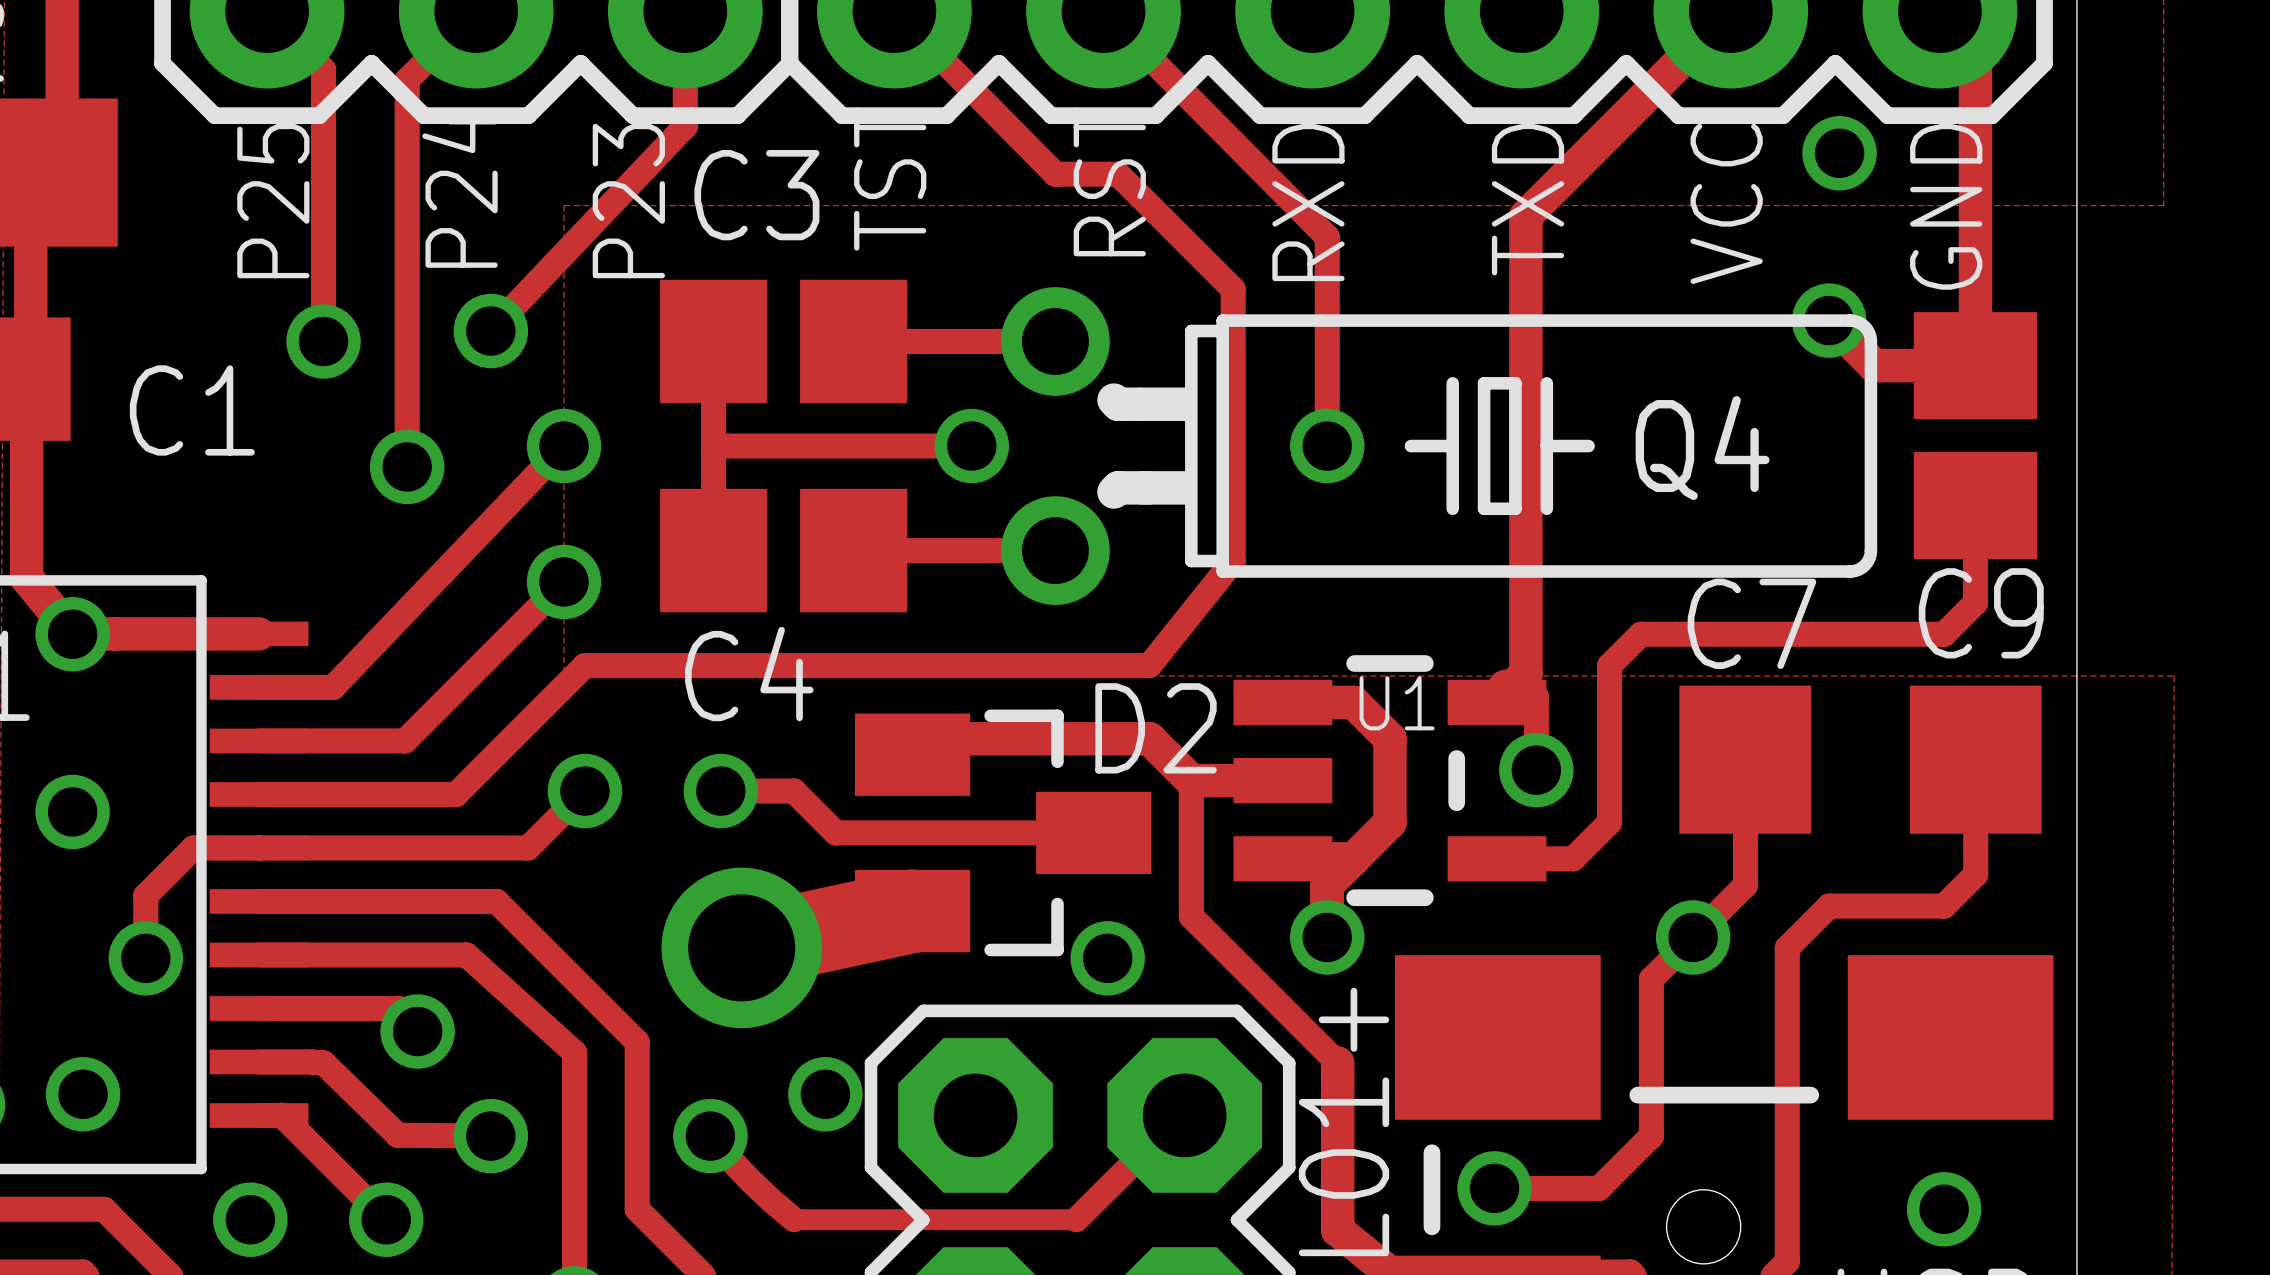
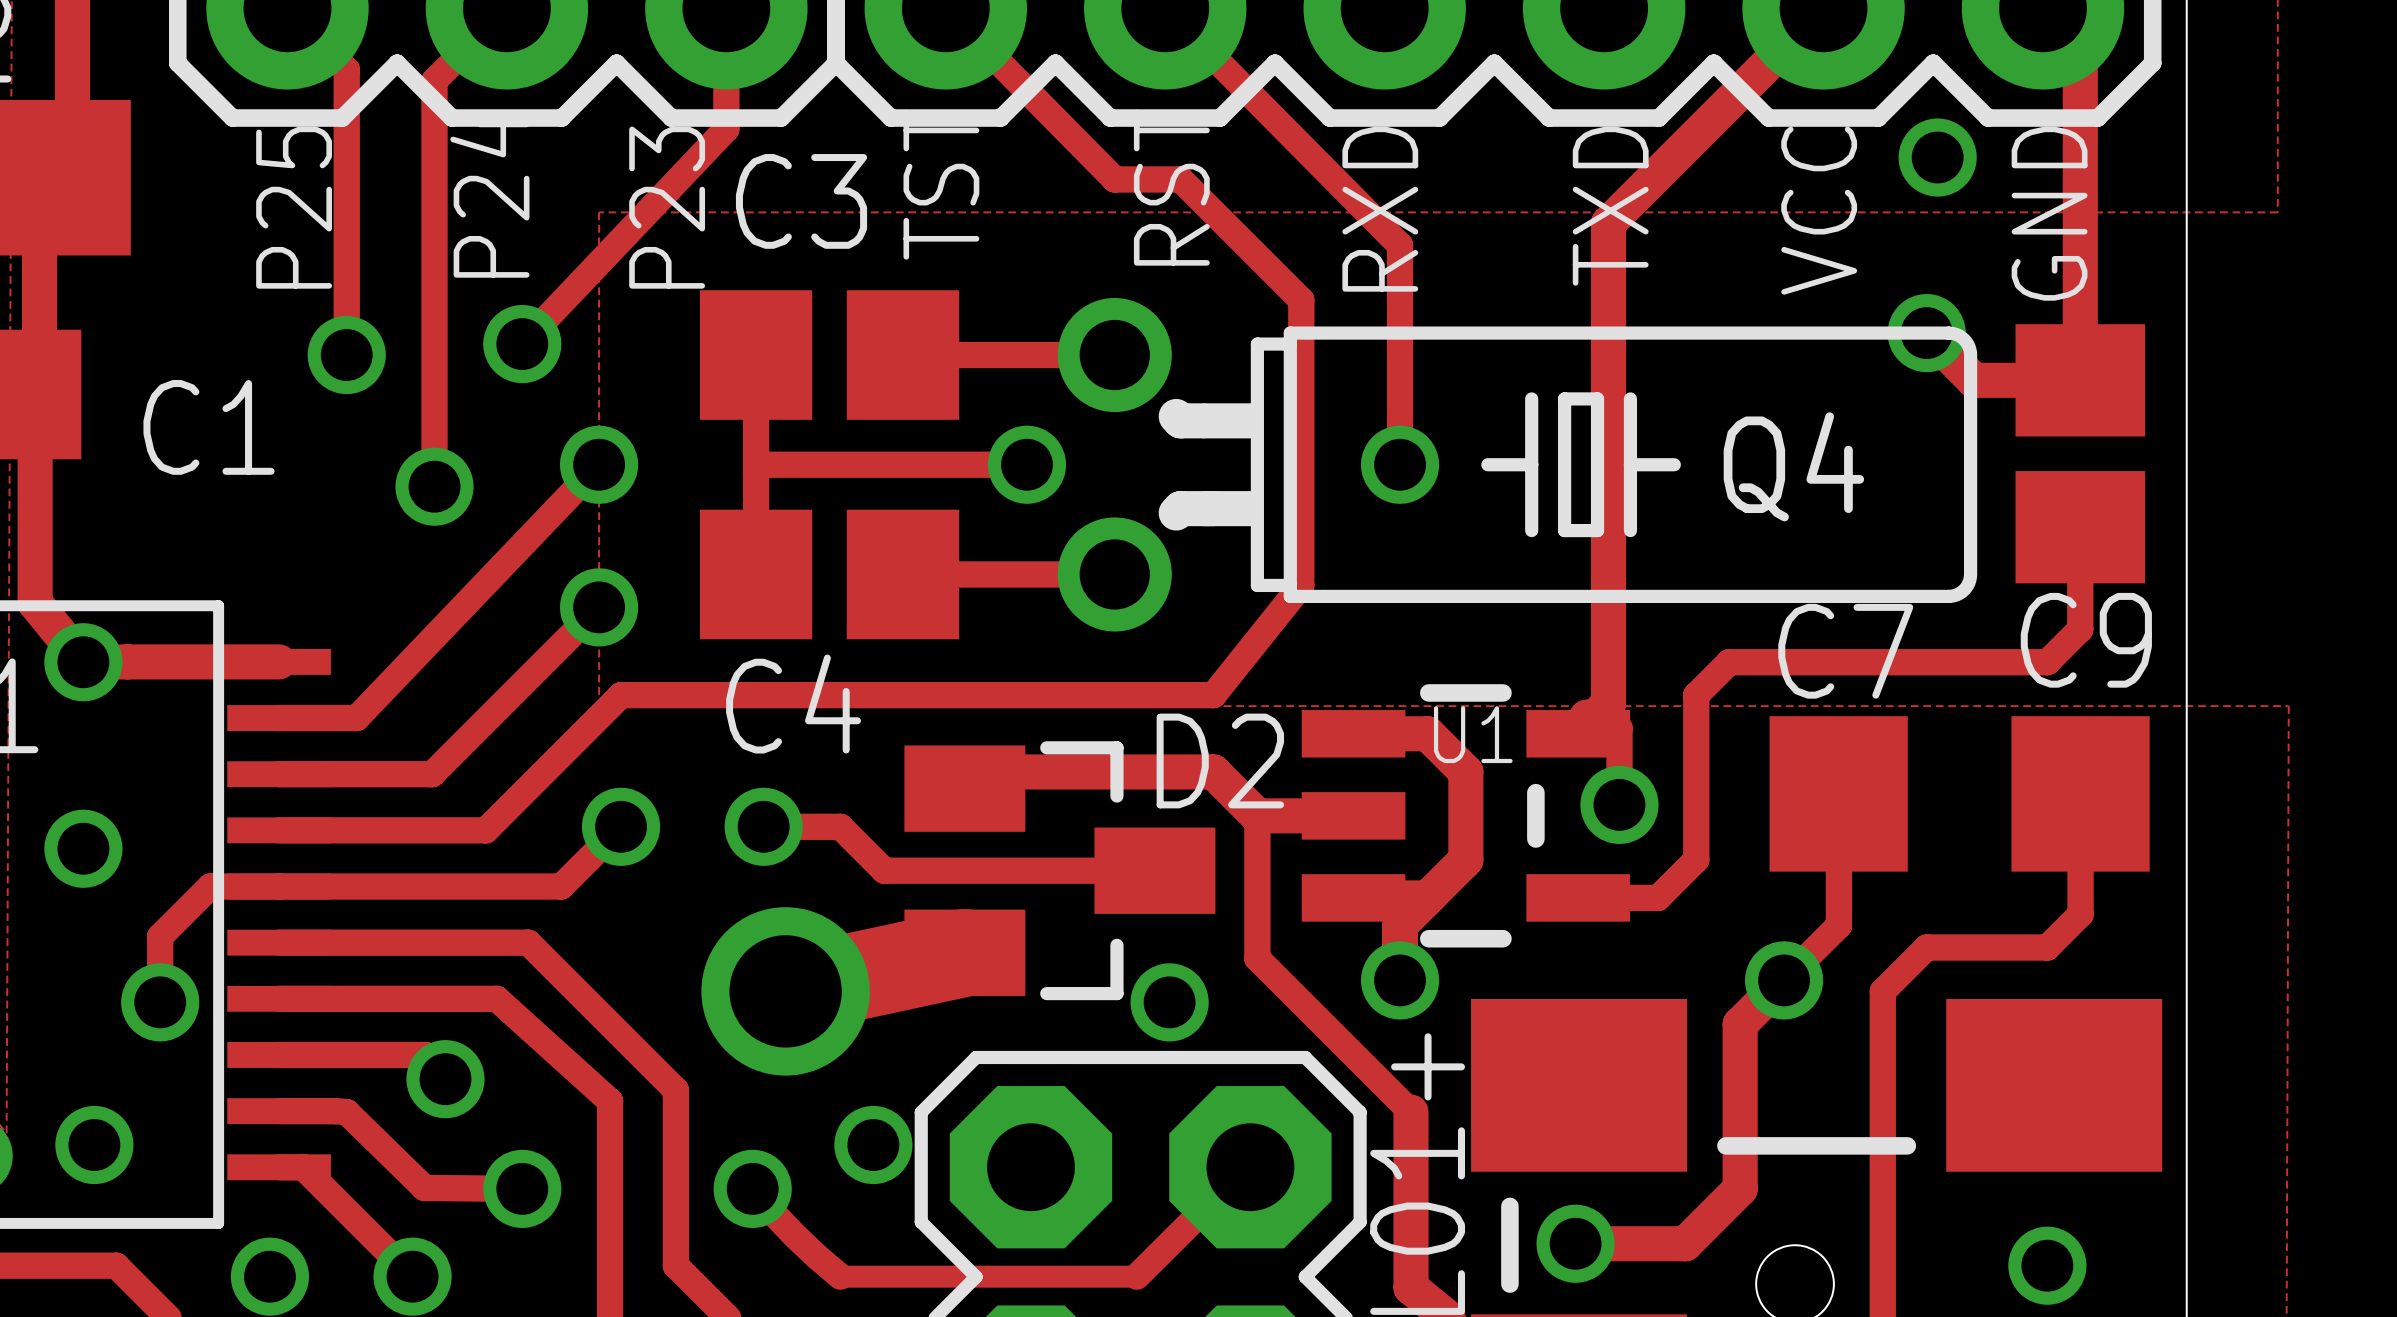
track width: thin (1693, 937) (1651, 979) (1651, 1136) (1599, 1188) (1494, 1188) -> thick (1784, 980) (1740, 1024) (1740, 1188) (1685, 1243) (1575, 1243)

